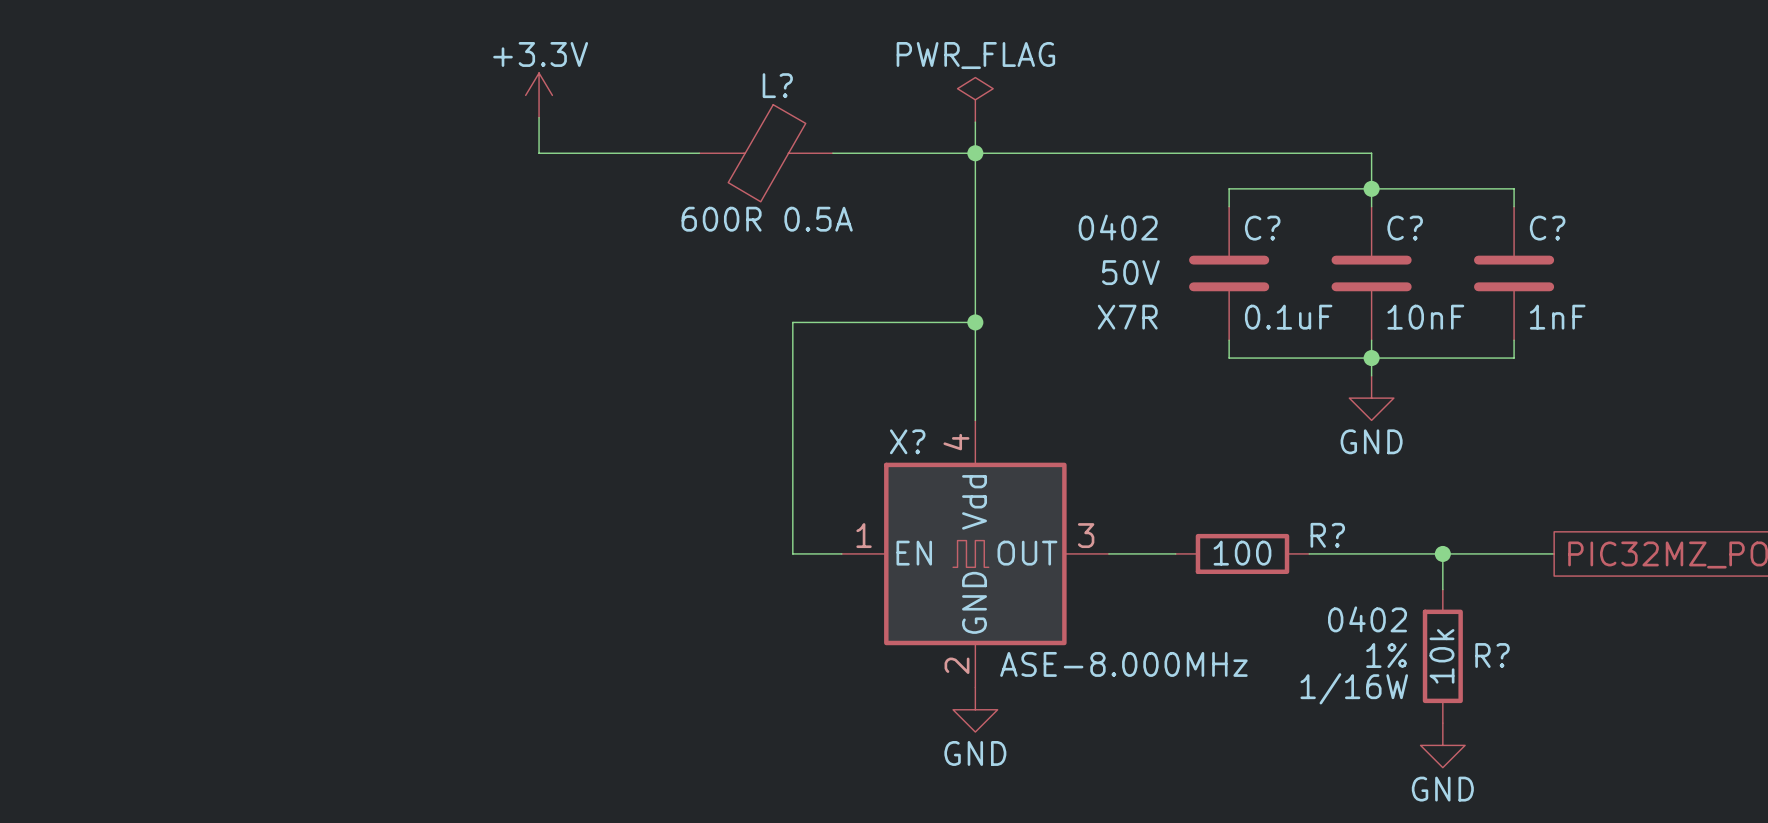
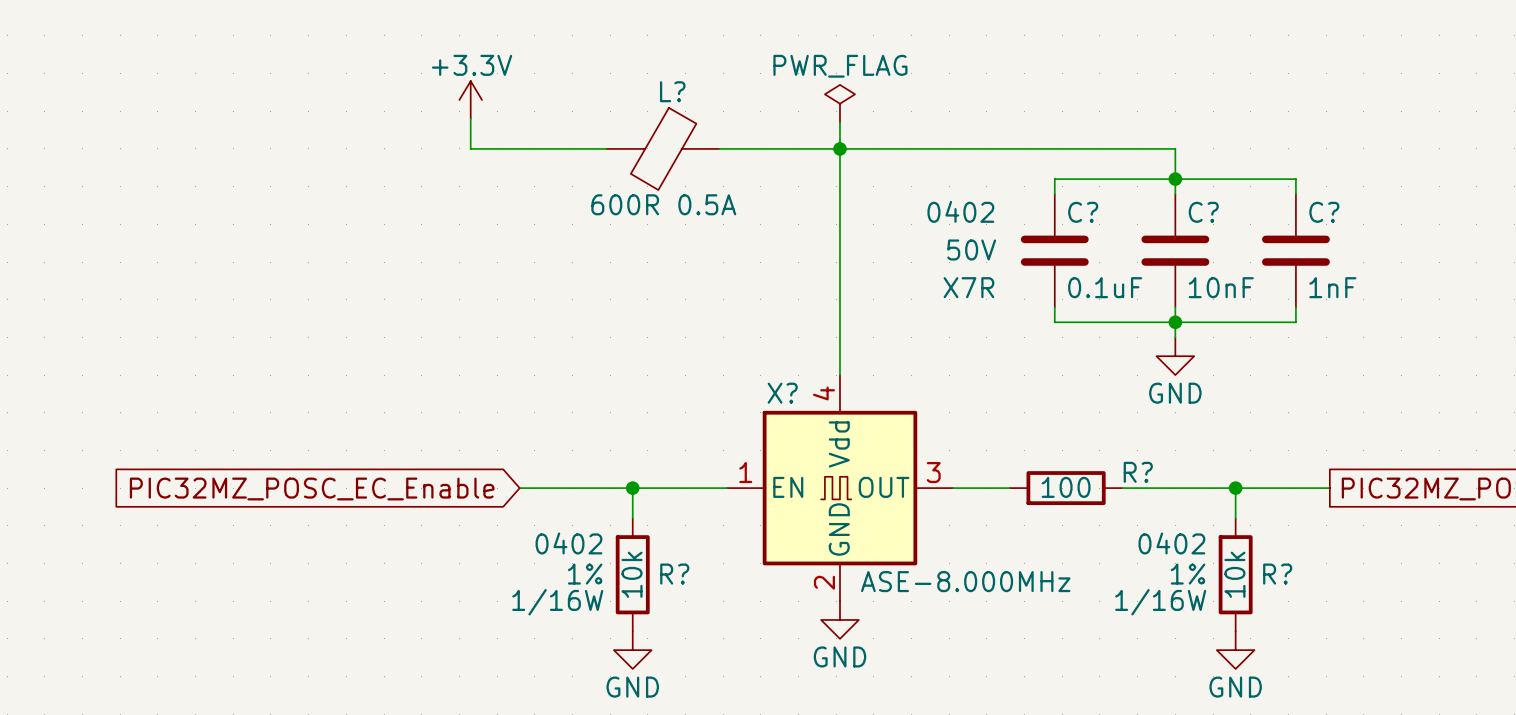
wire: (975, 322) (792, 322) (792, 553) -> (519, 488) (685, 488)
junction: (975, 322) -> none
wire: none -> (632, 488) (632, 518)
junction: none -> (632, 488)
global label: none -> PIC32MZ_POSC_EC_Enable (312, 488)
R?: none -> 10k (632, 574)
power symbol: none -> GND (632, 650)

